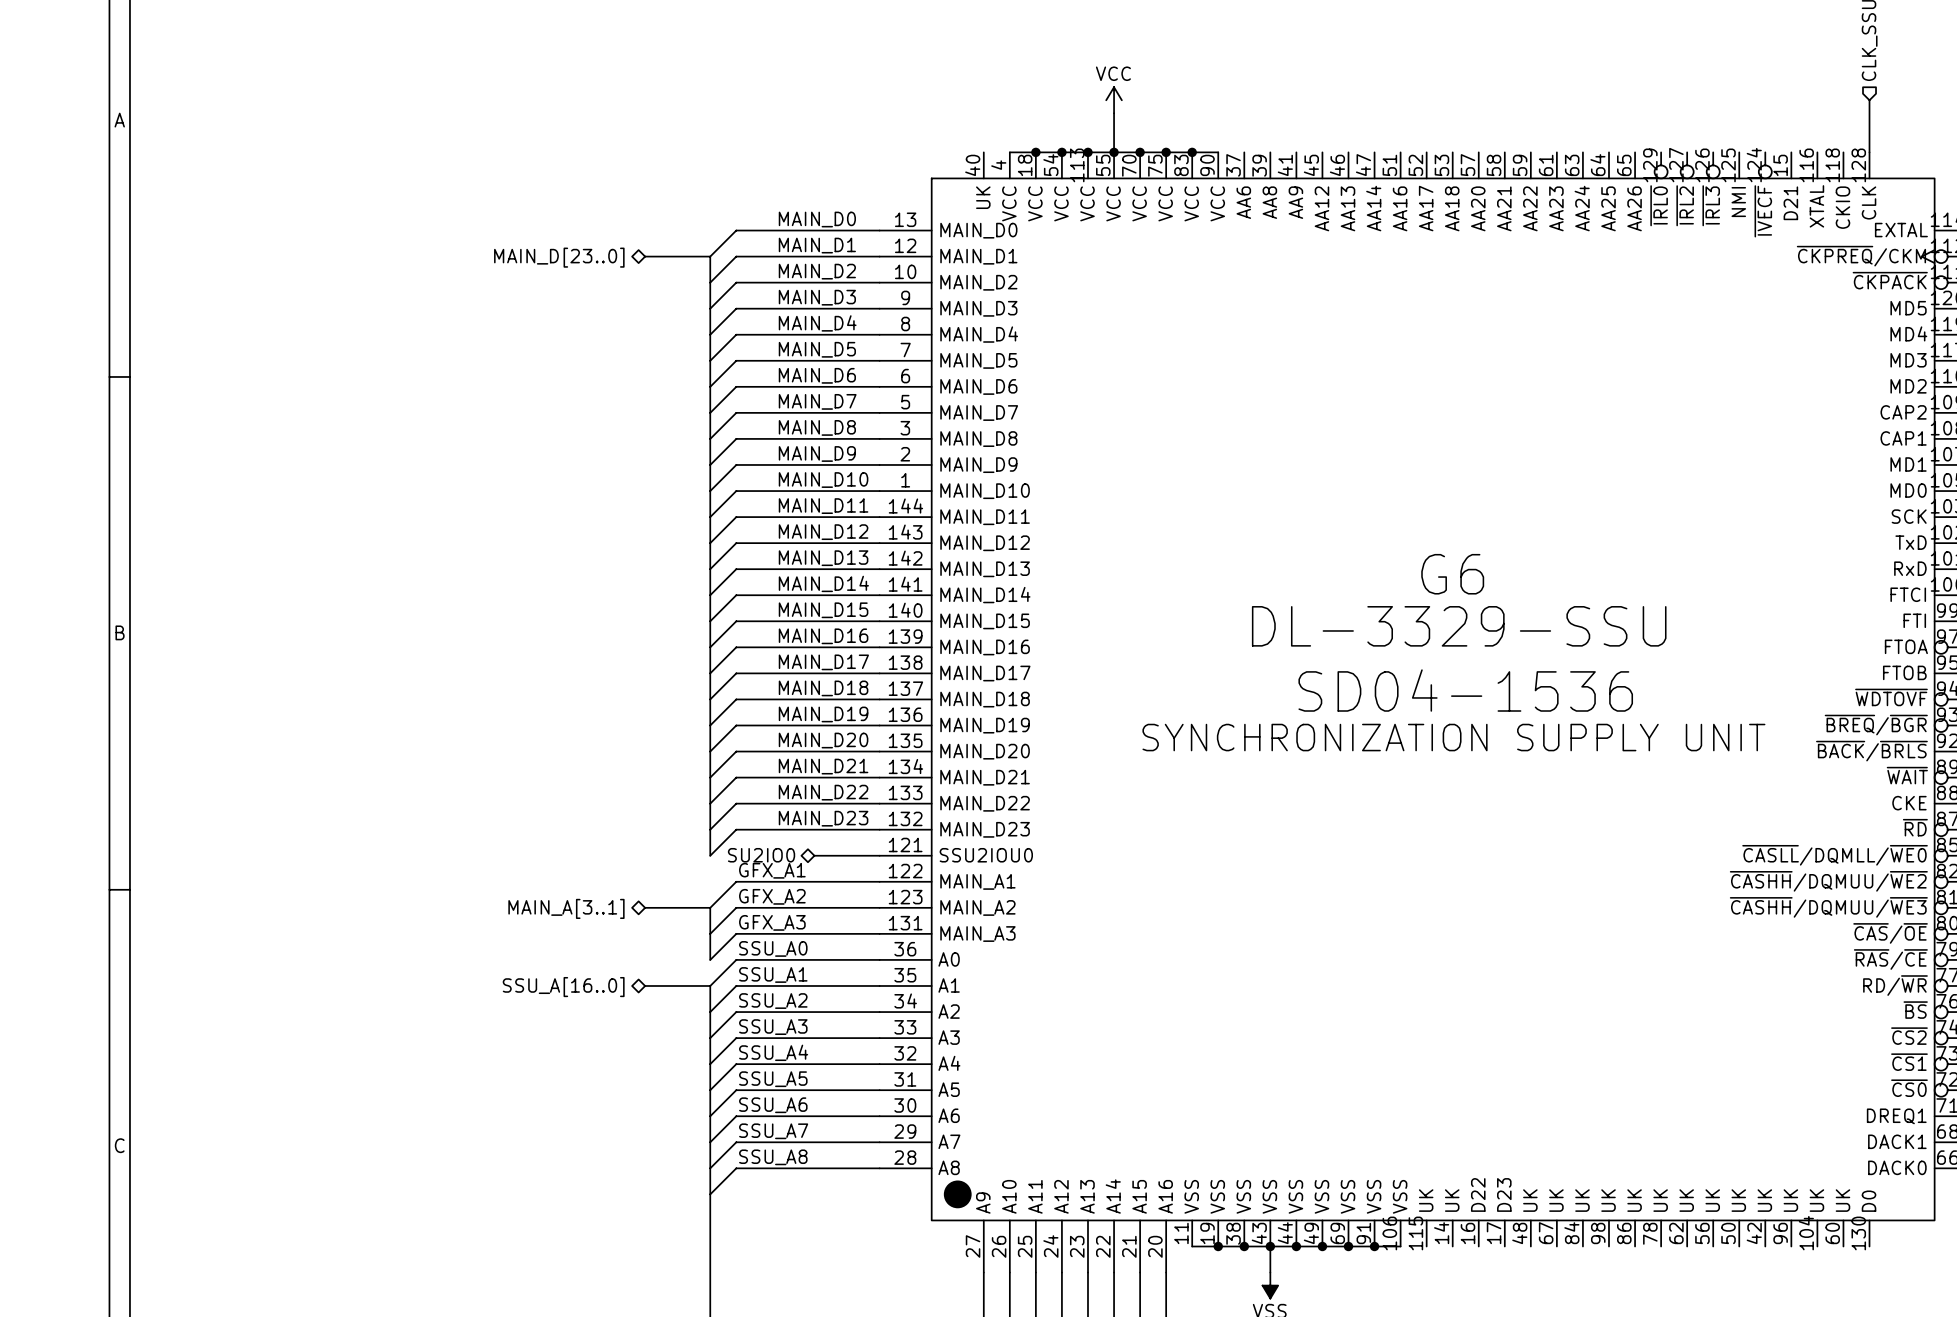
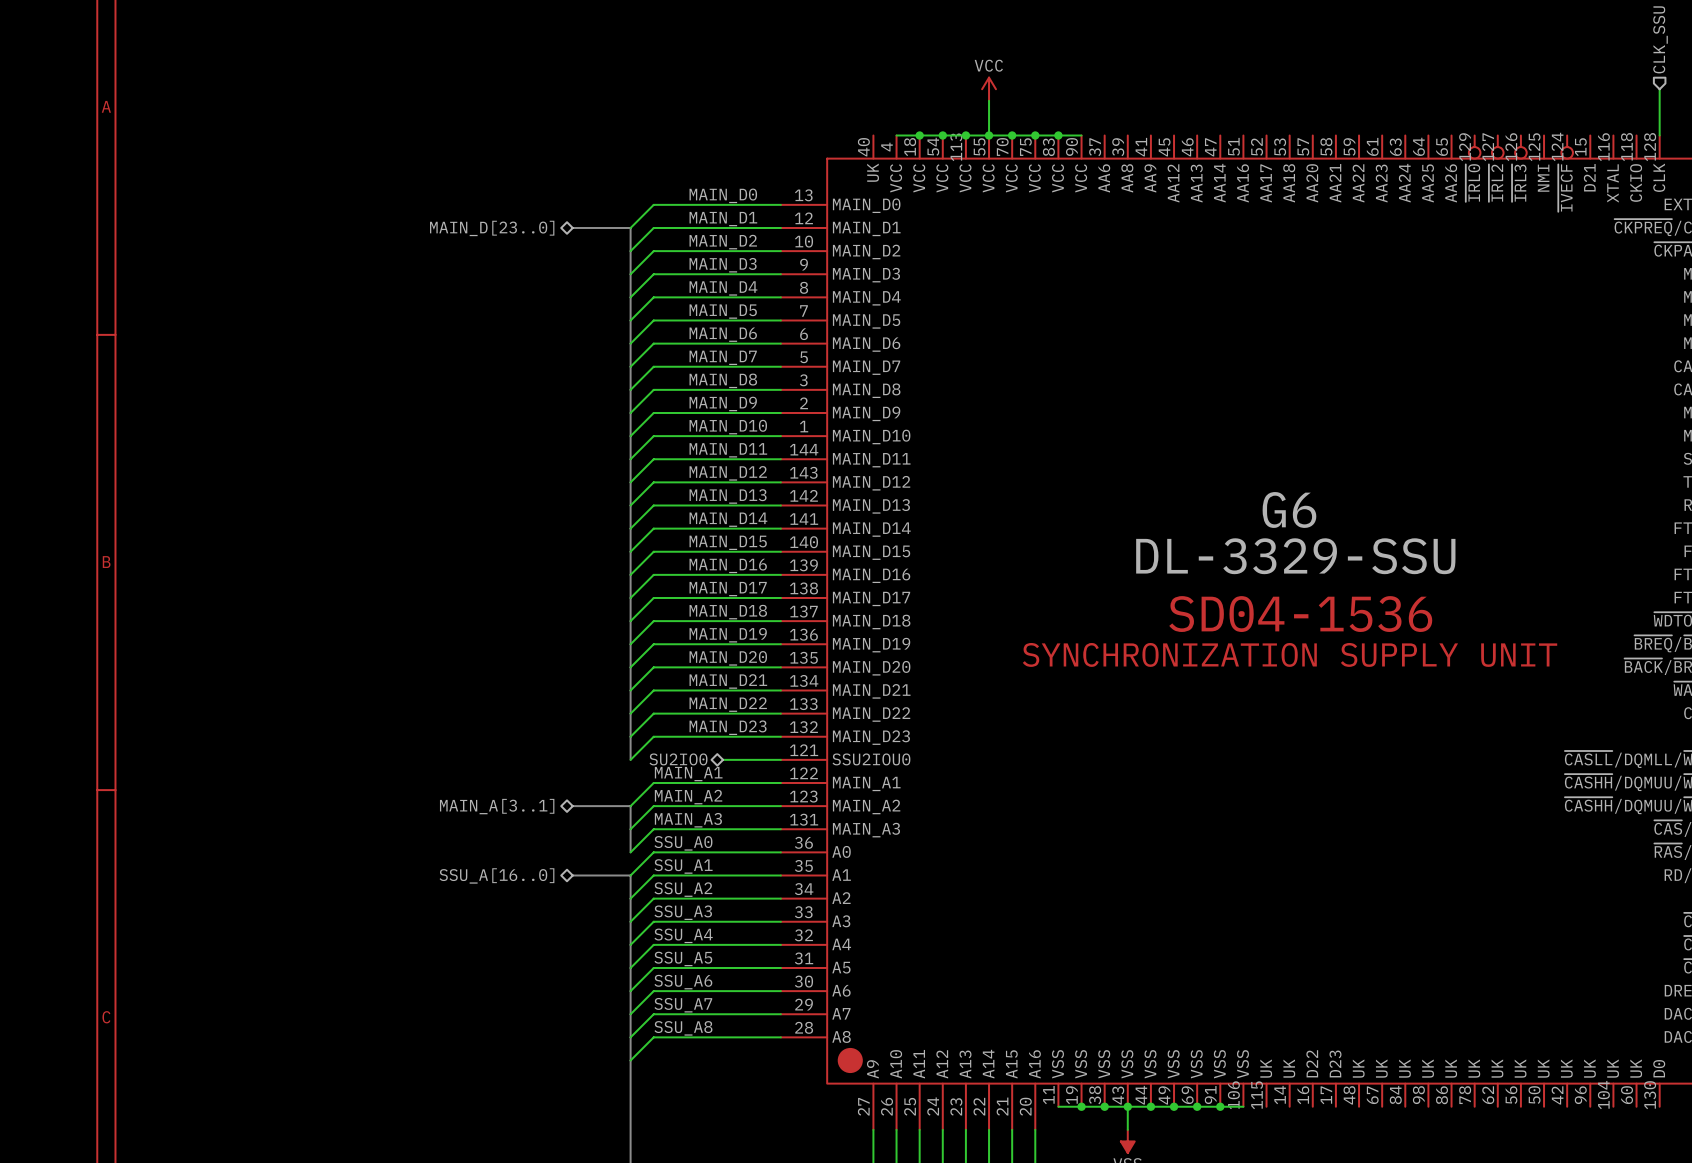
label: GFX_A1 (772, 870) -> MAIN_A1 (688, 774)
label: GFX_A2 (772, 896) -> MAIN_A2 (688, 797)
label: GFX_A3 (772, 922) -> MAIN_A3 (688, 820)

